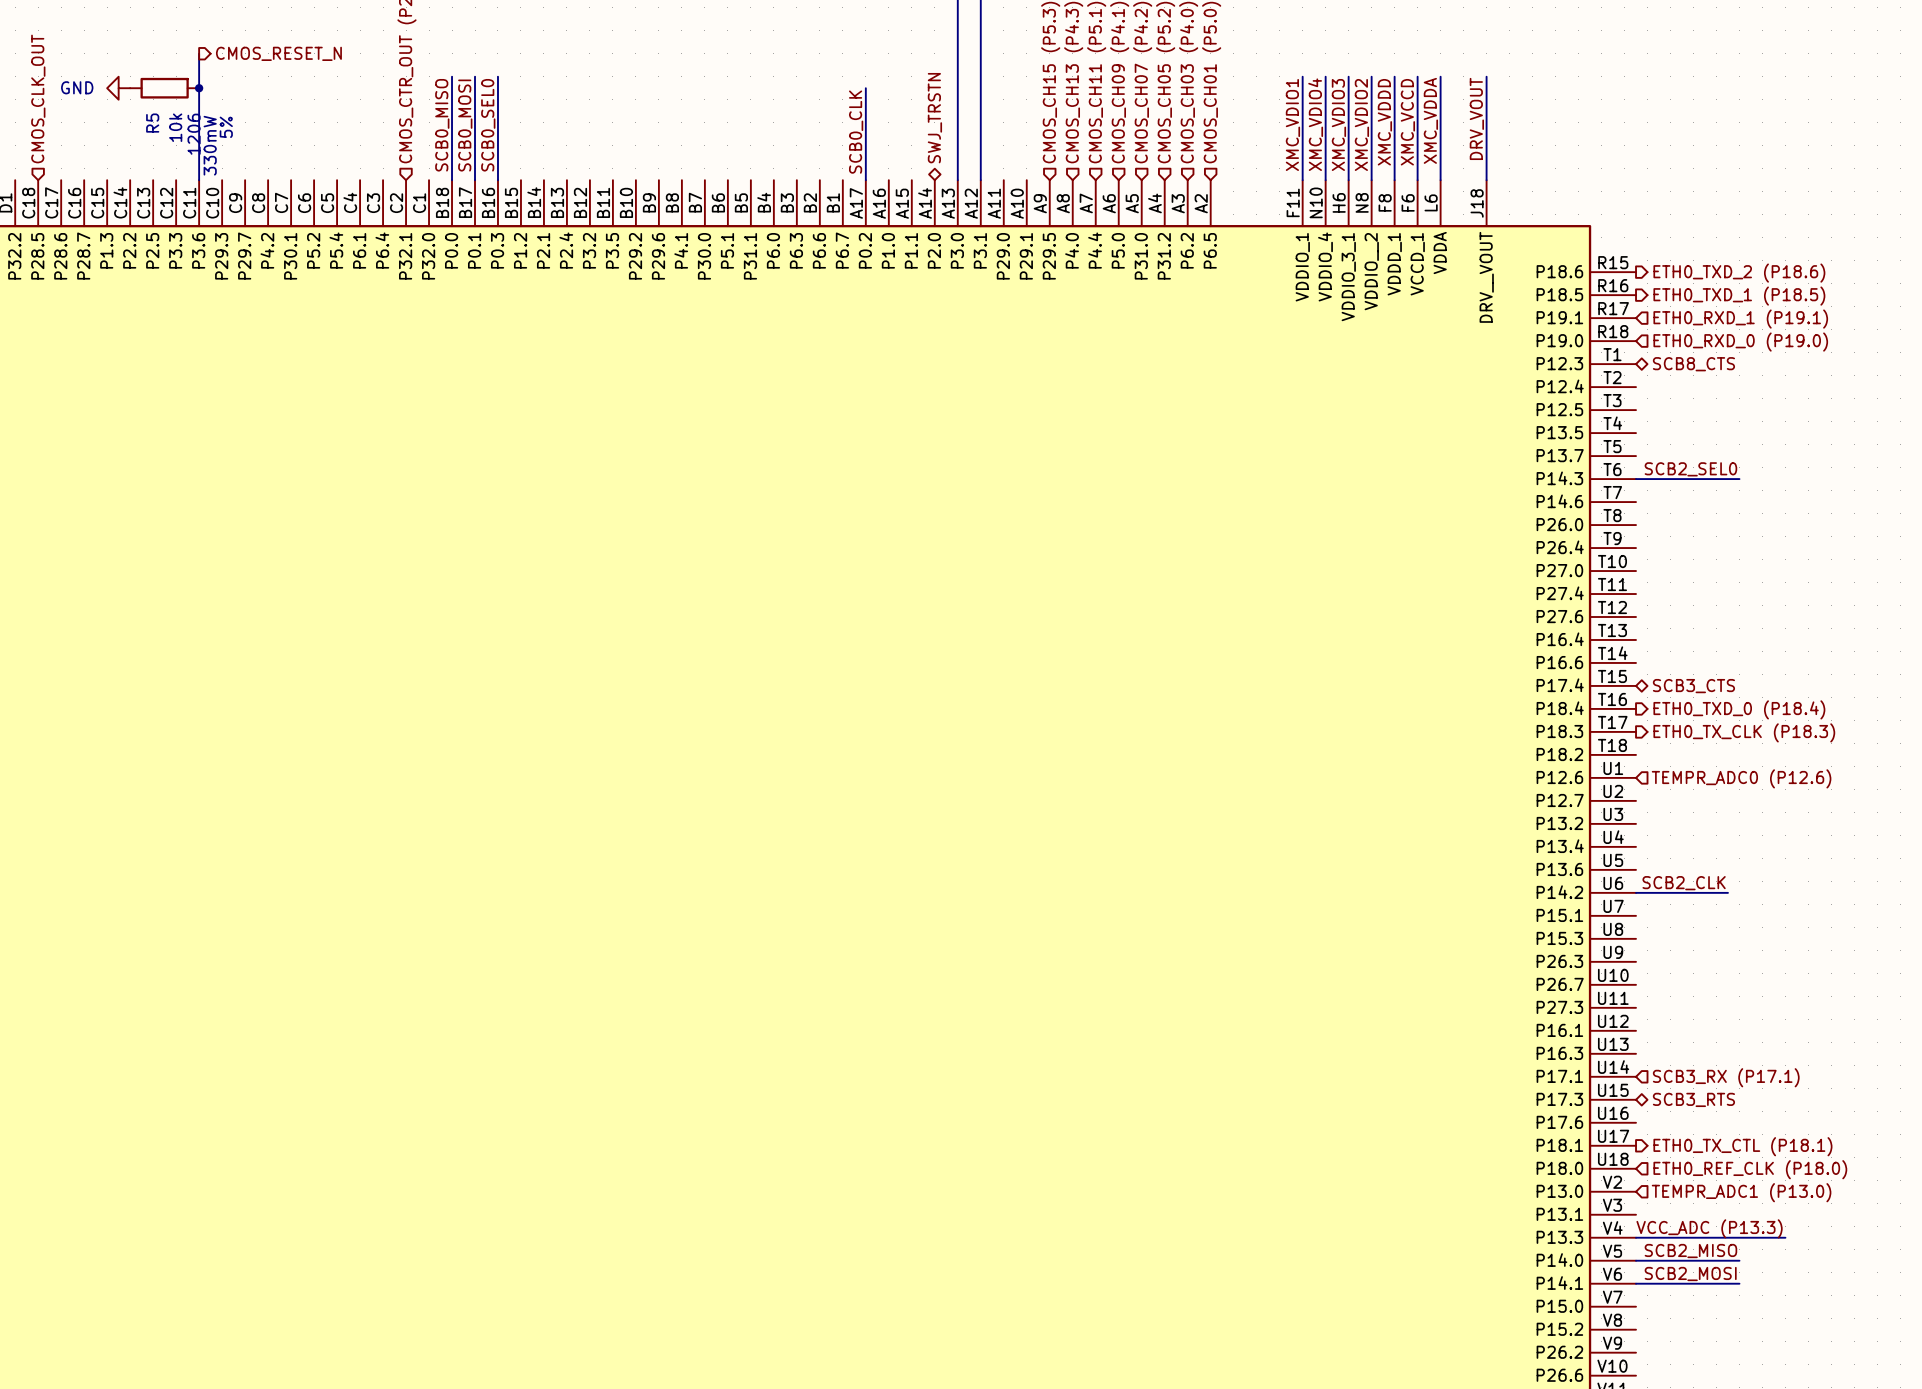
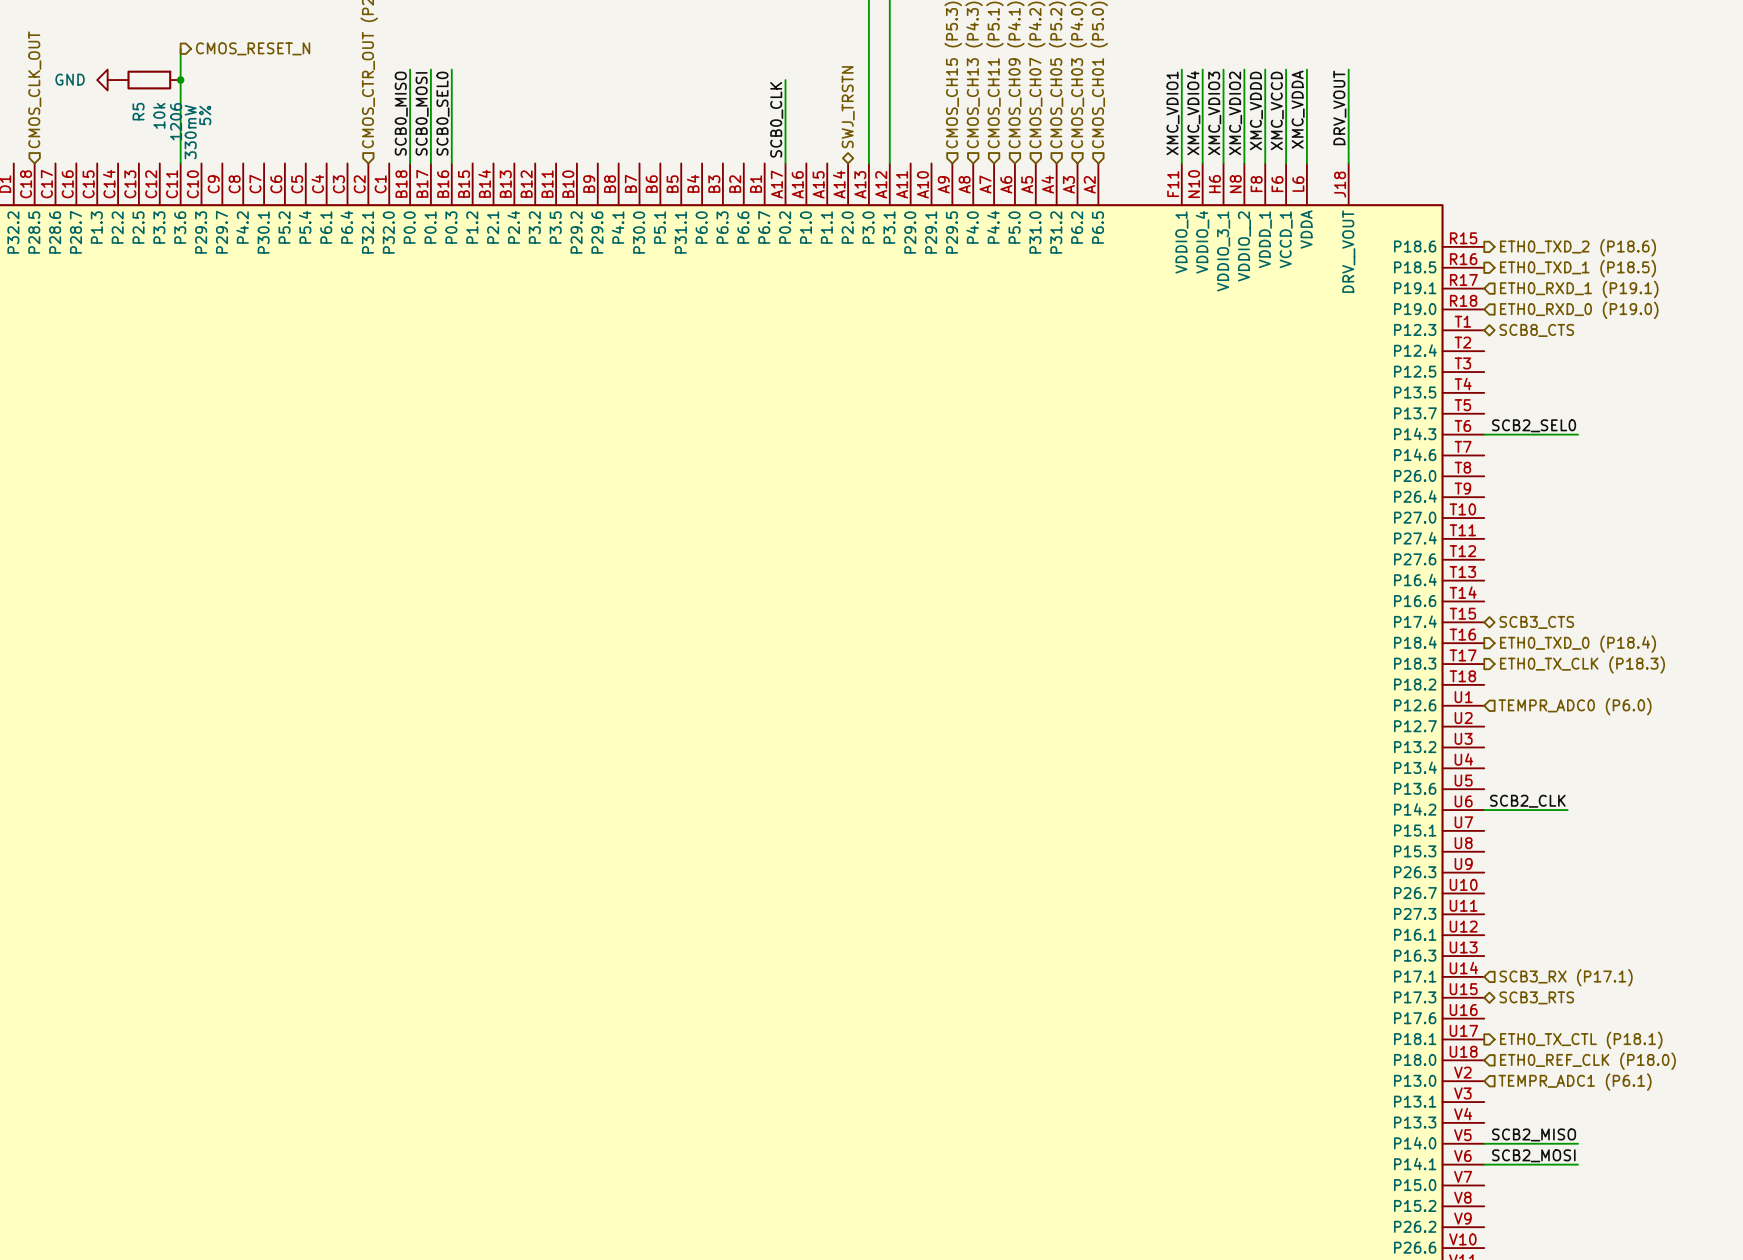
hierarchical label: TEMPR_ADC0 (P12.6) (1741, 778) -> TEMPR_ADC0 (P6.0) (1575, 706)
hierarchical label: TEMPR_ADC1 (P13.0) (1741, 1192) -> TEMPR_ADC1 (P6.1) (1575, 1082)
label: VCC_ADC (P13.3) (1709, 1228) -> none
wire: (1636, 1237) (1785, 1237) -> none

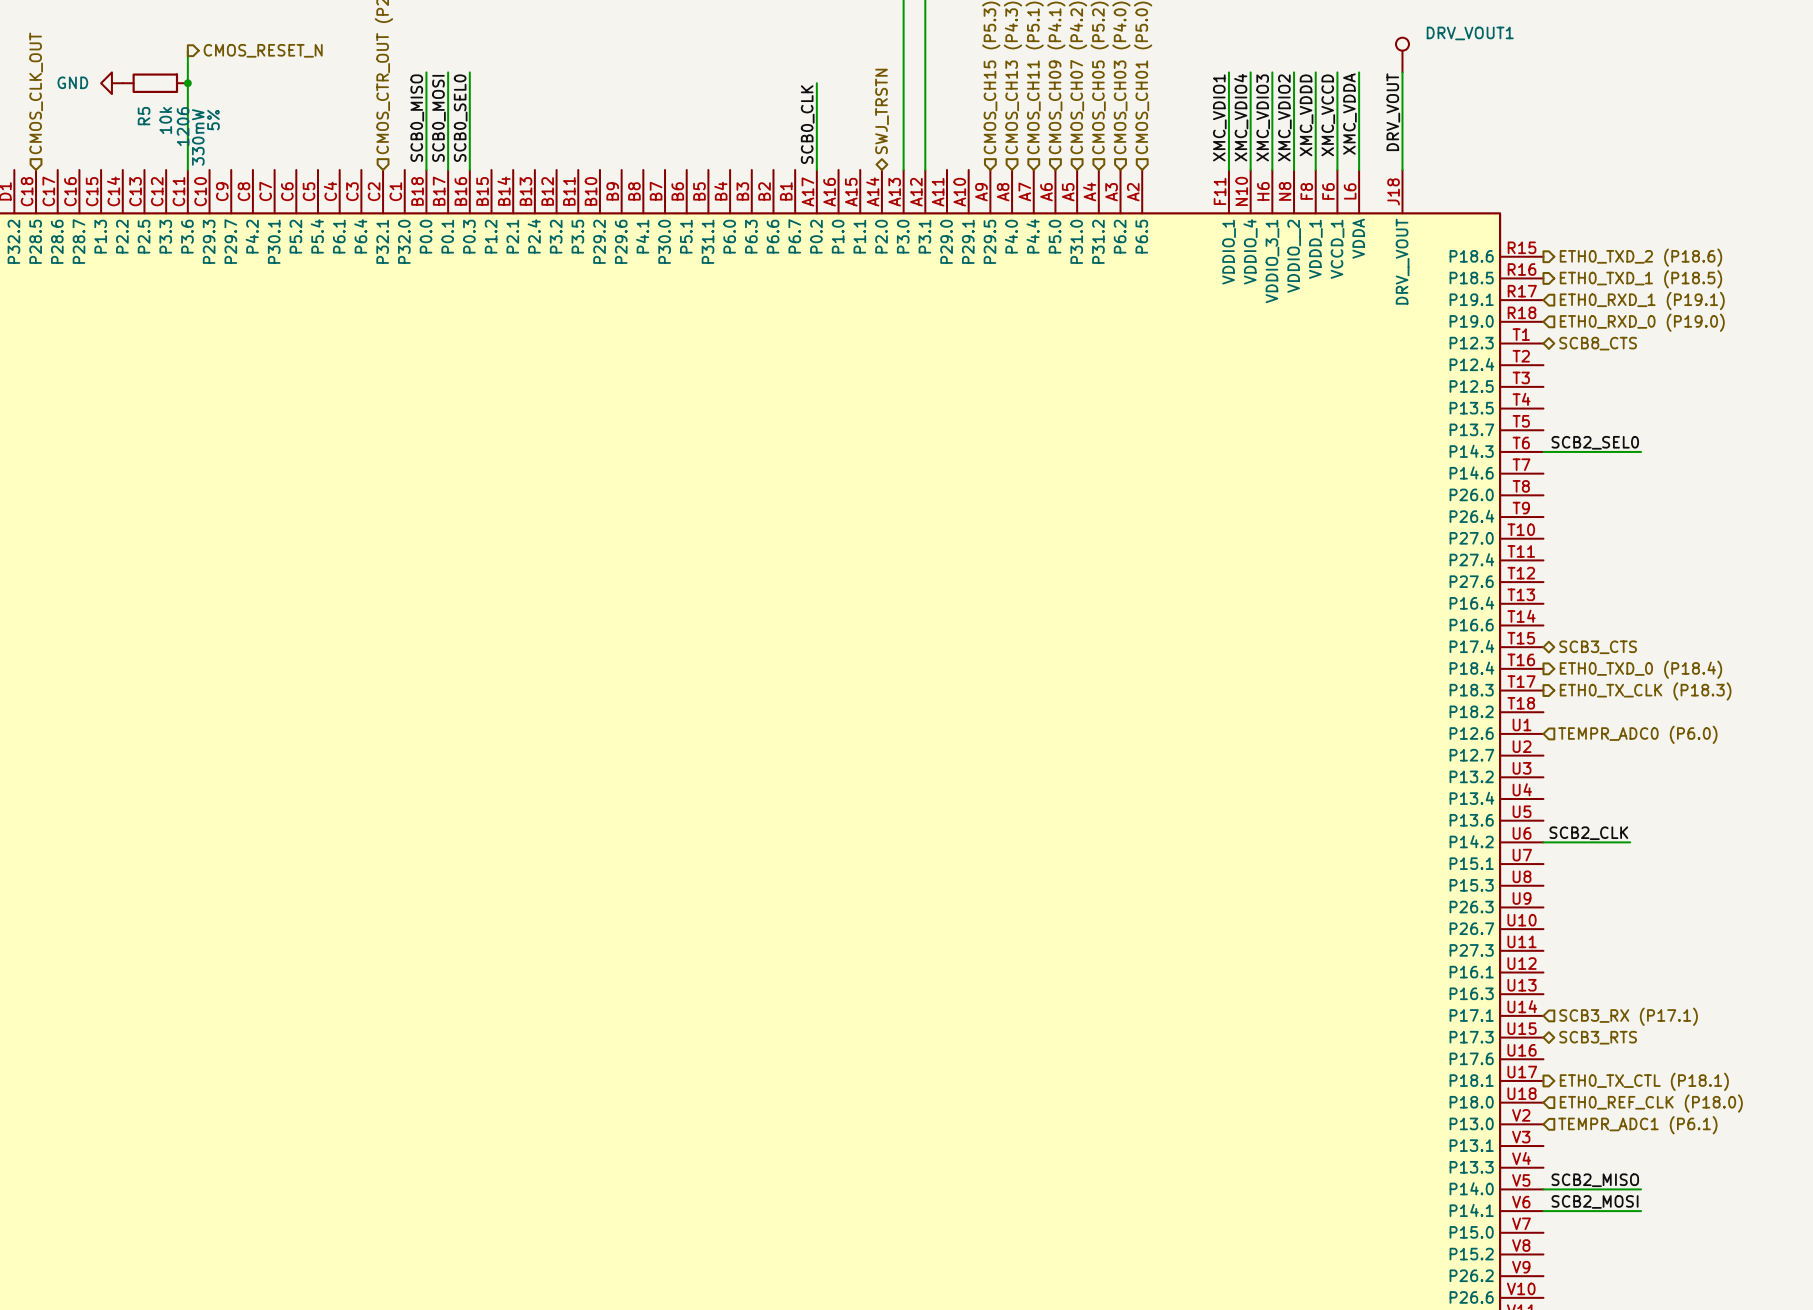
DRV_VOUT1: none -> (1402, 55)

